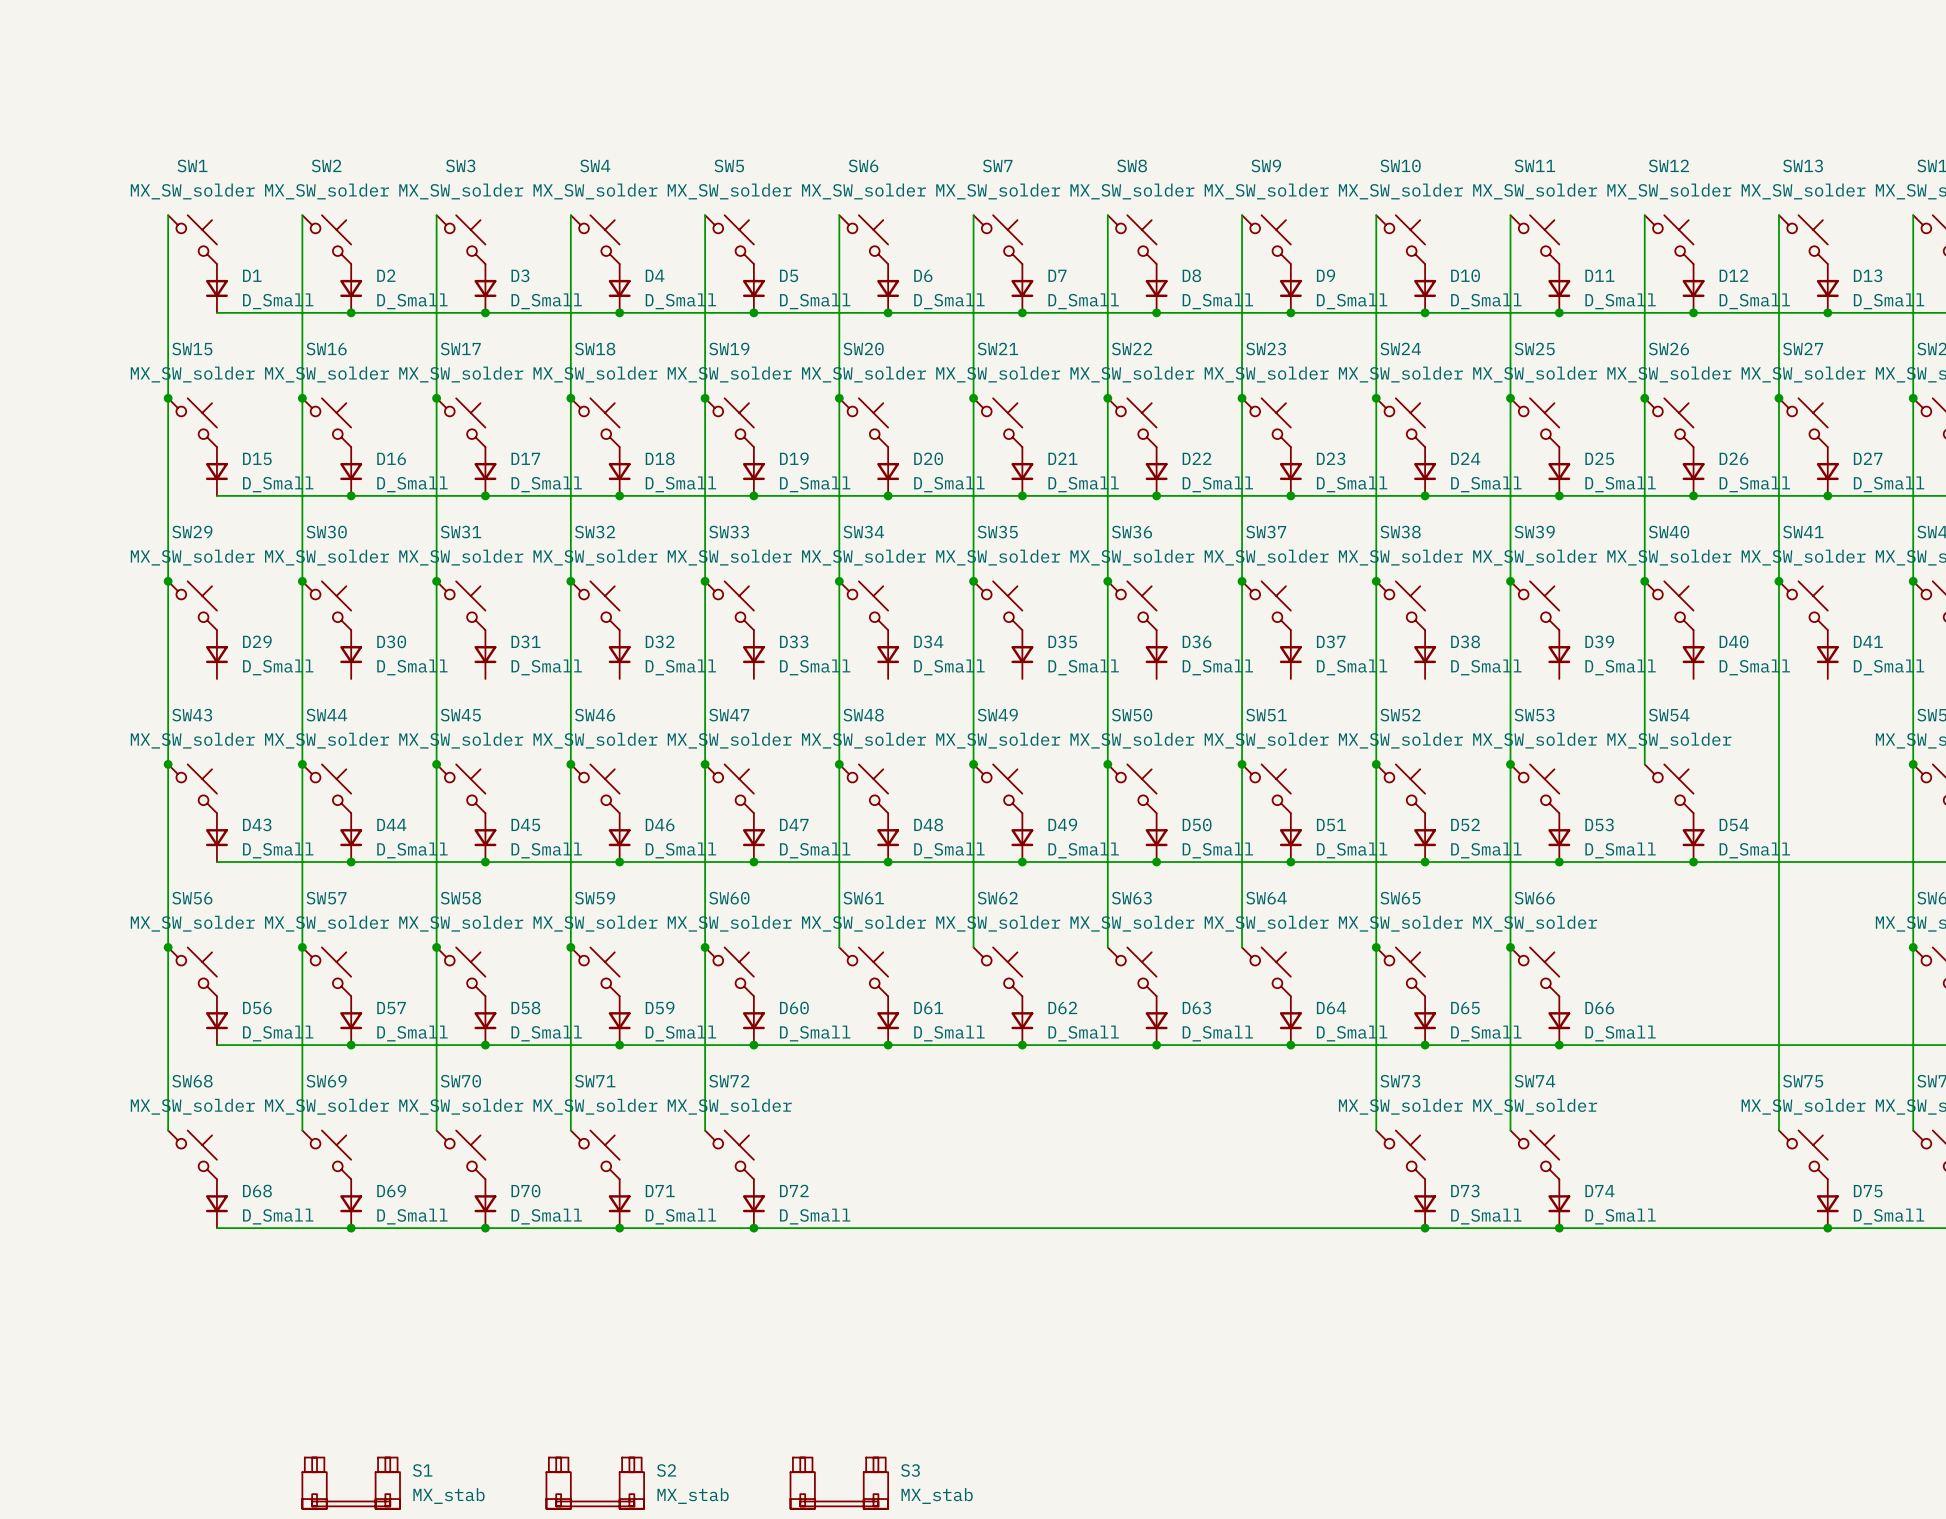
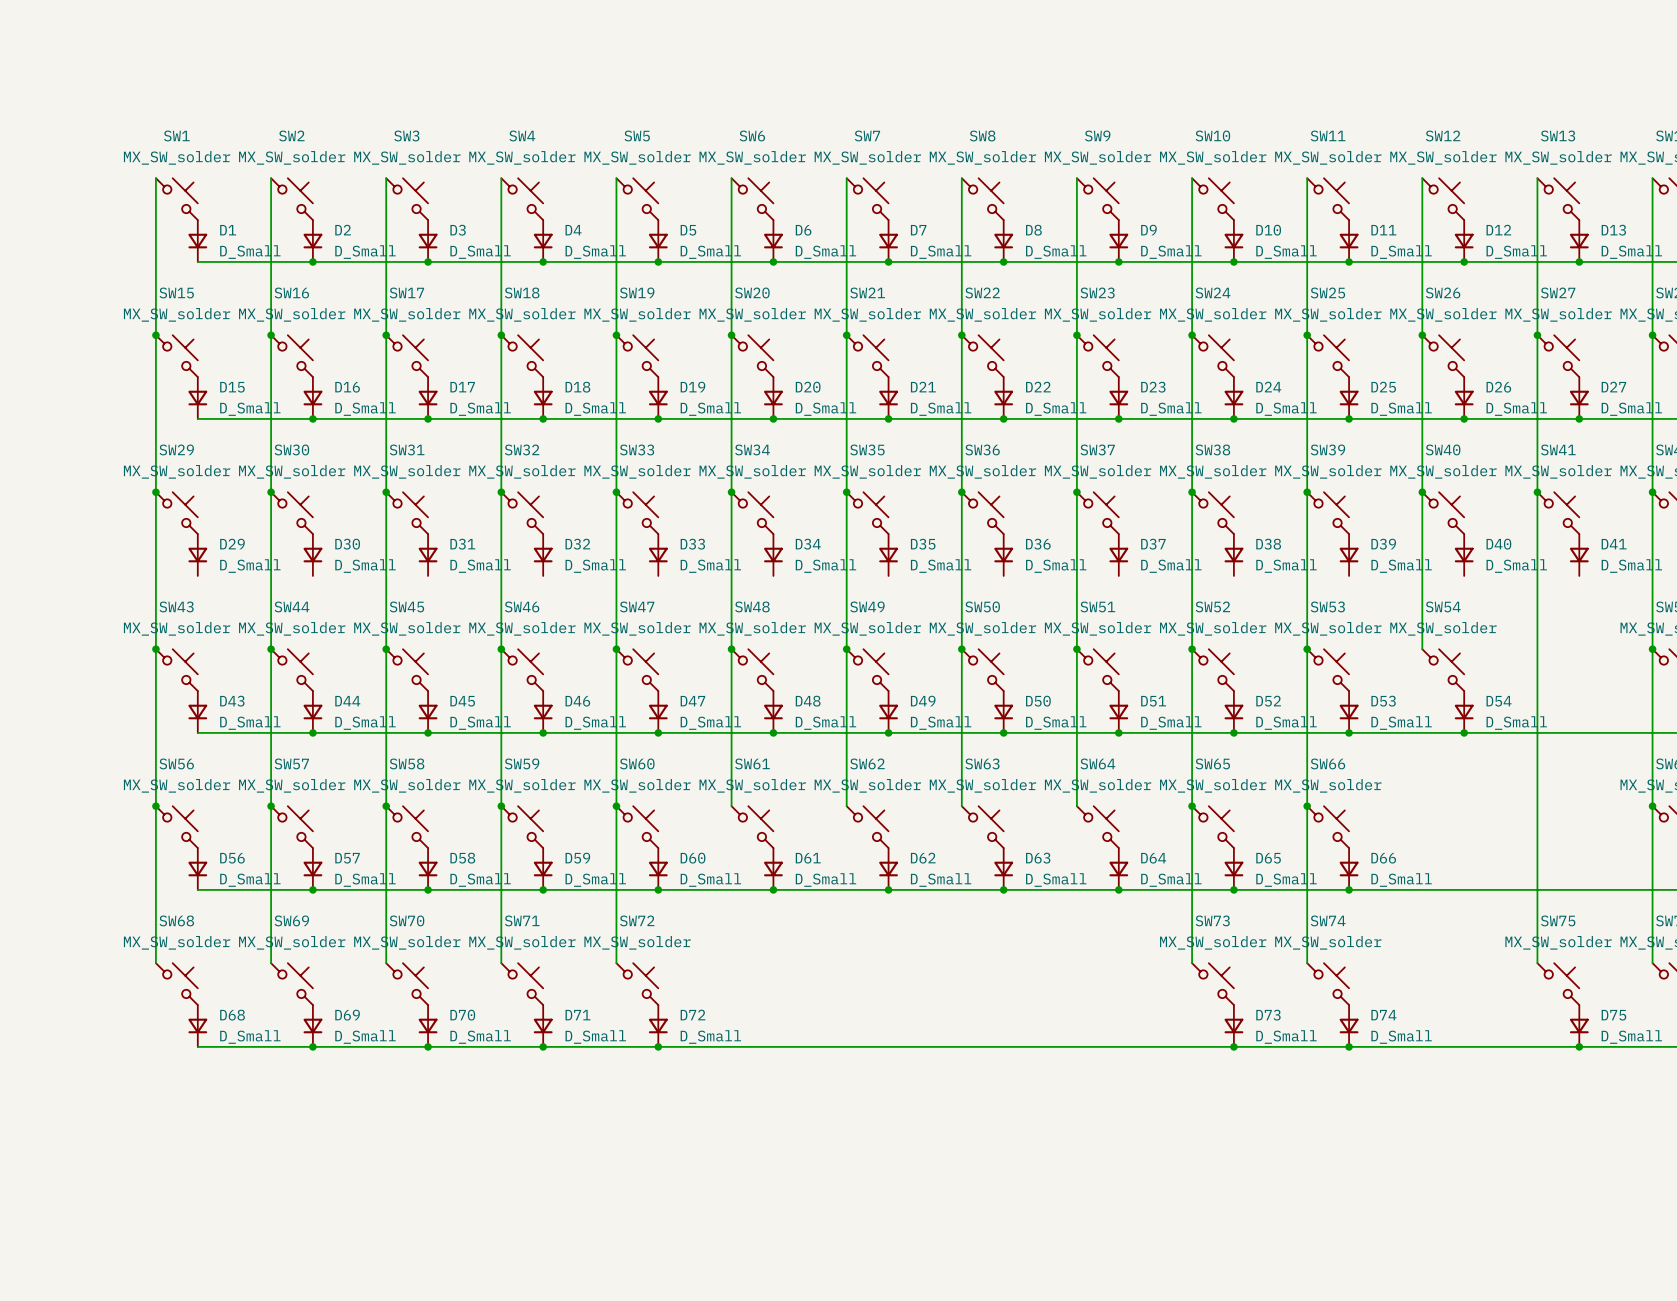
S1: MX_stab (351, 1483) -> none
S2: MX_stab (595, 1483) -> none
S3: MX_stab (839, 1483) -> none

